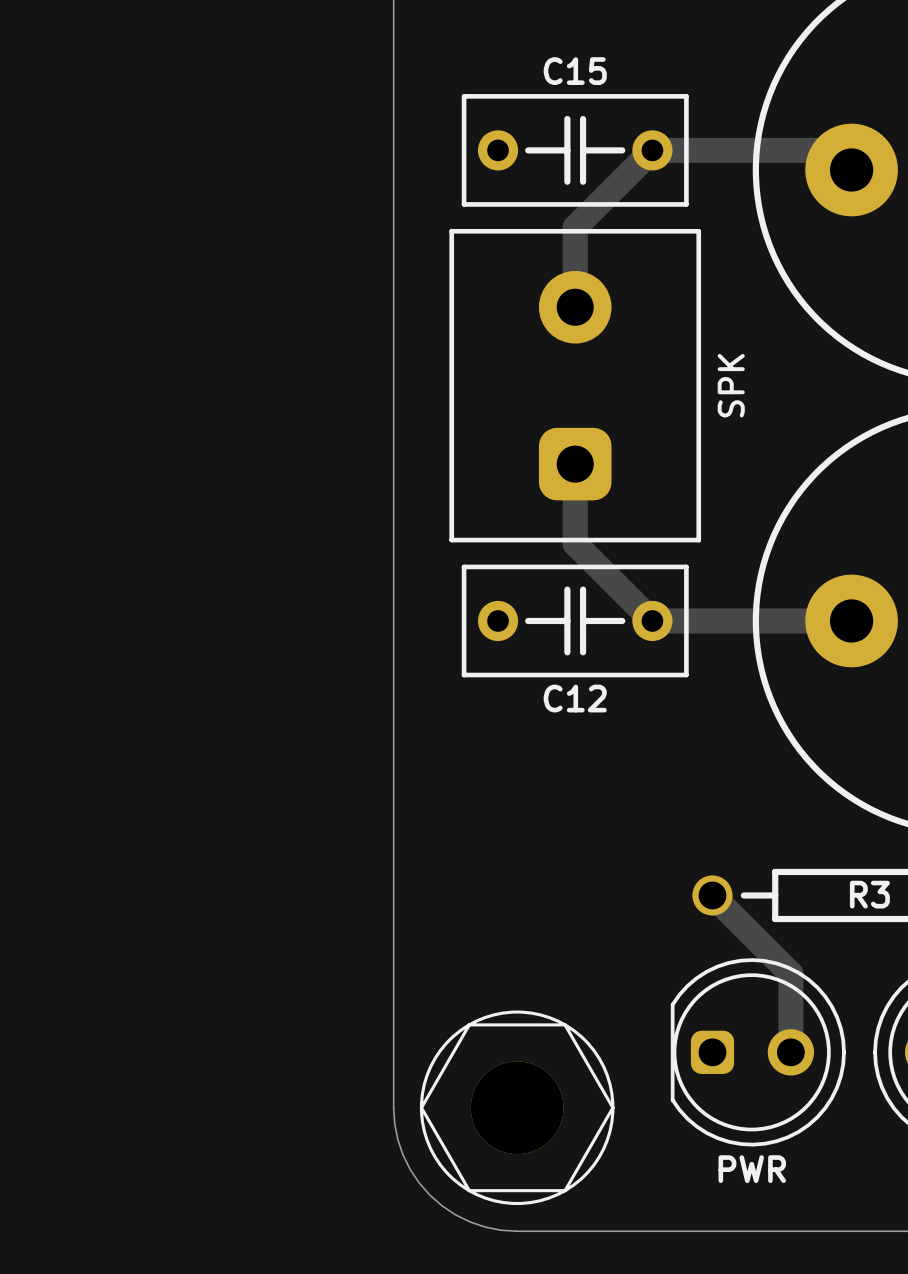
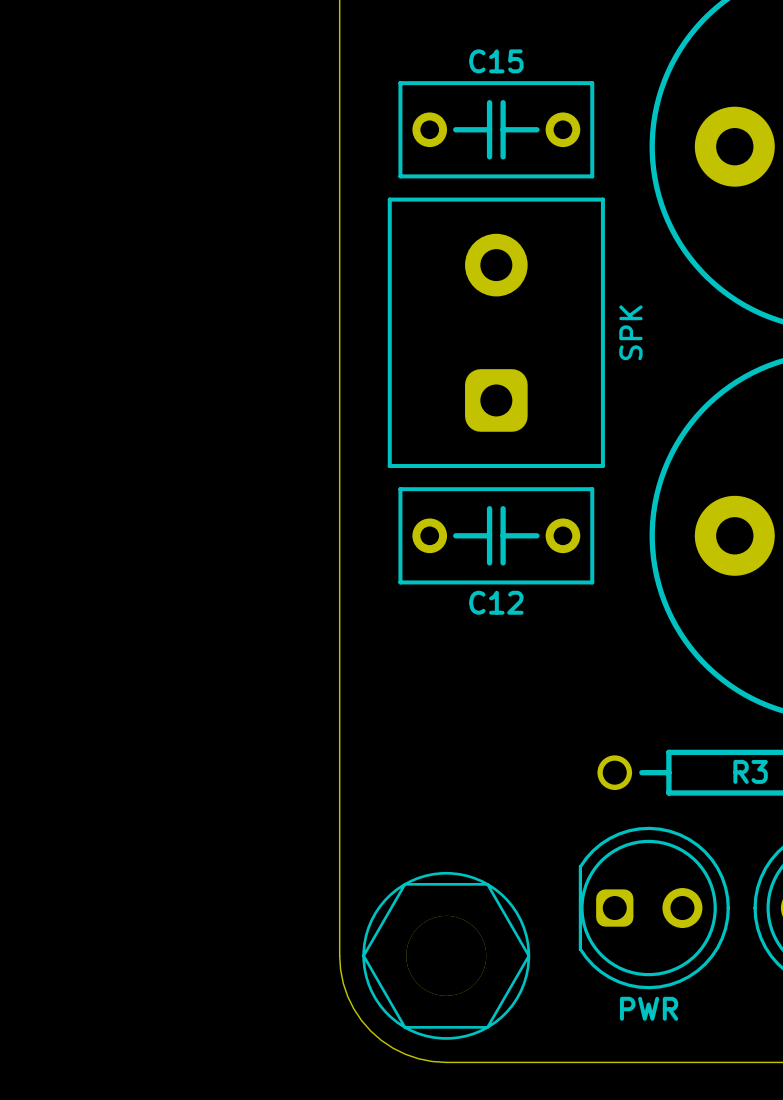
track: (851, 170) (861, 170) (841, 150) (652, 150) (575, 227) (575, 307) -> none
track: (575, 464) (575, 543) (652, 620) (851, 620) -> none
track: (712, 895) (790, 973) (790, 1052) -> none

